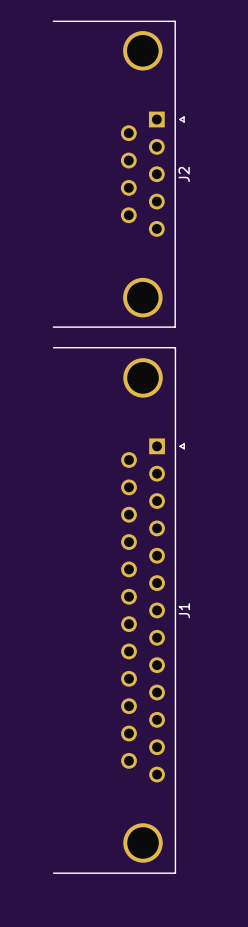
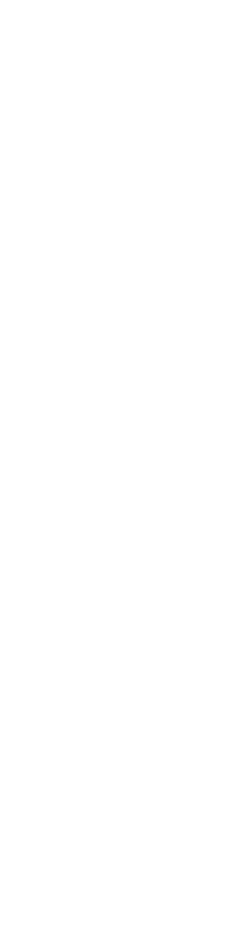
J2: (118, 174) -> none
J1: (118, 610) -> none

